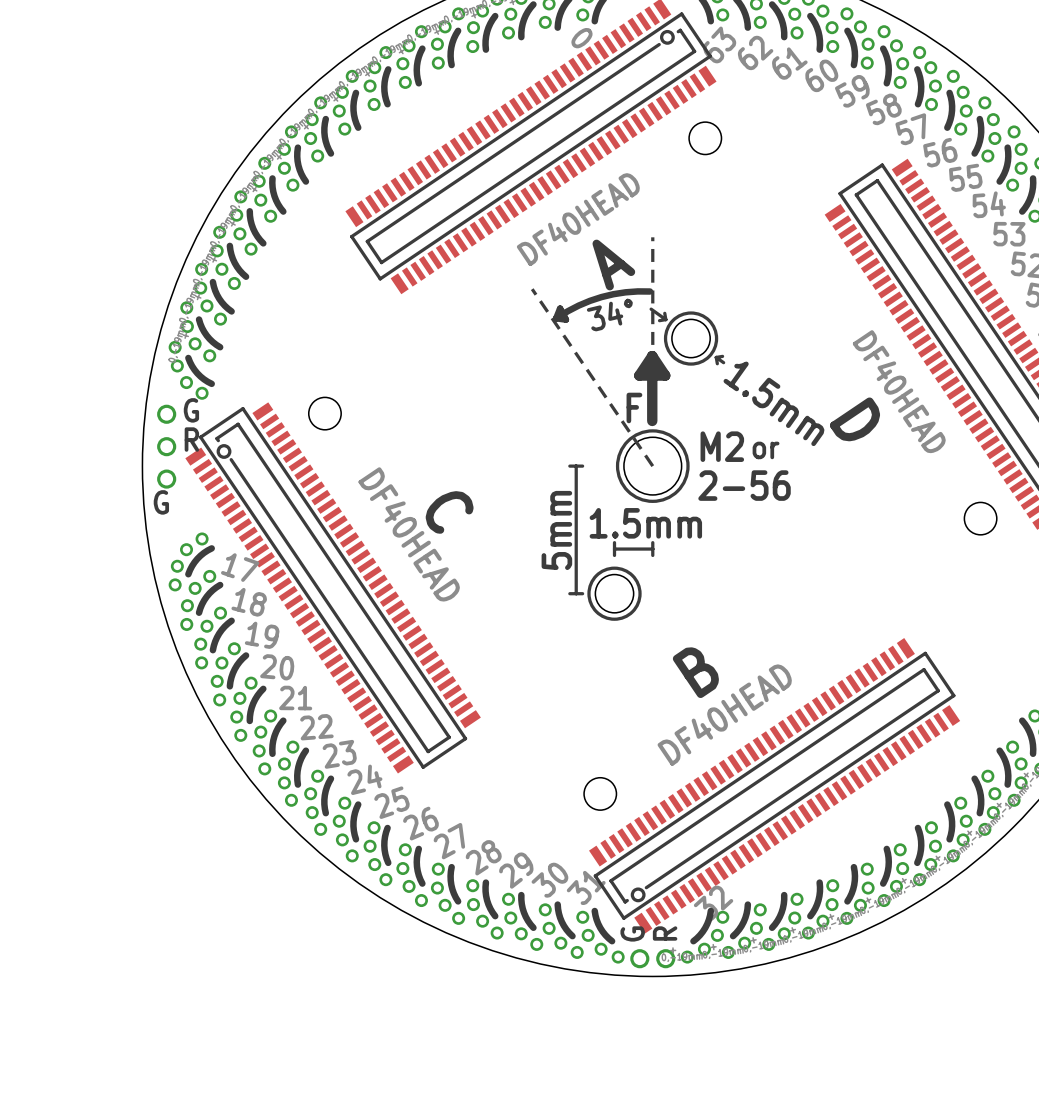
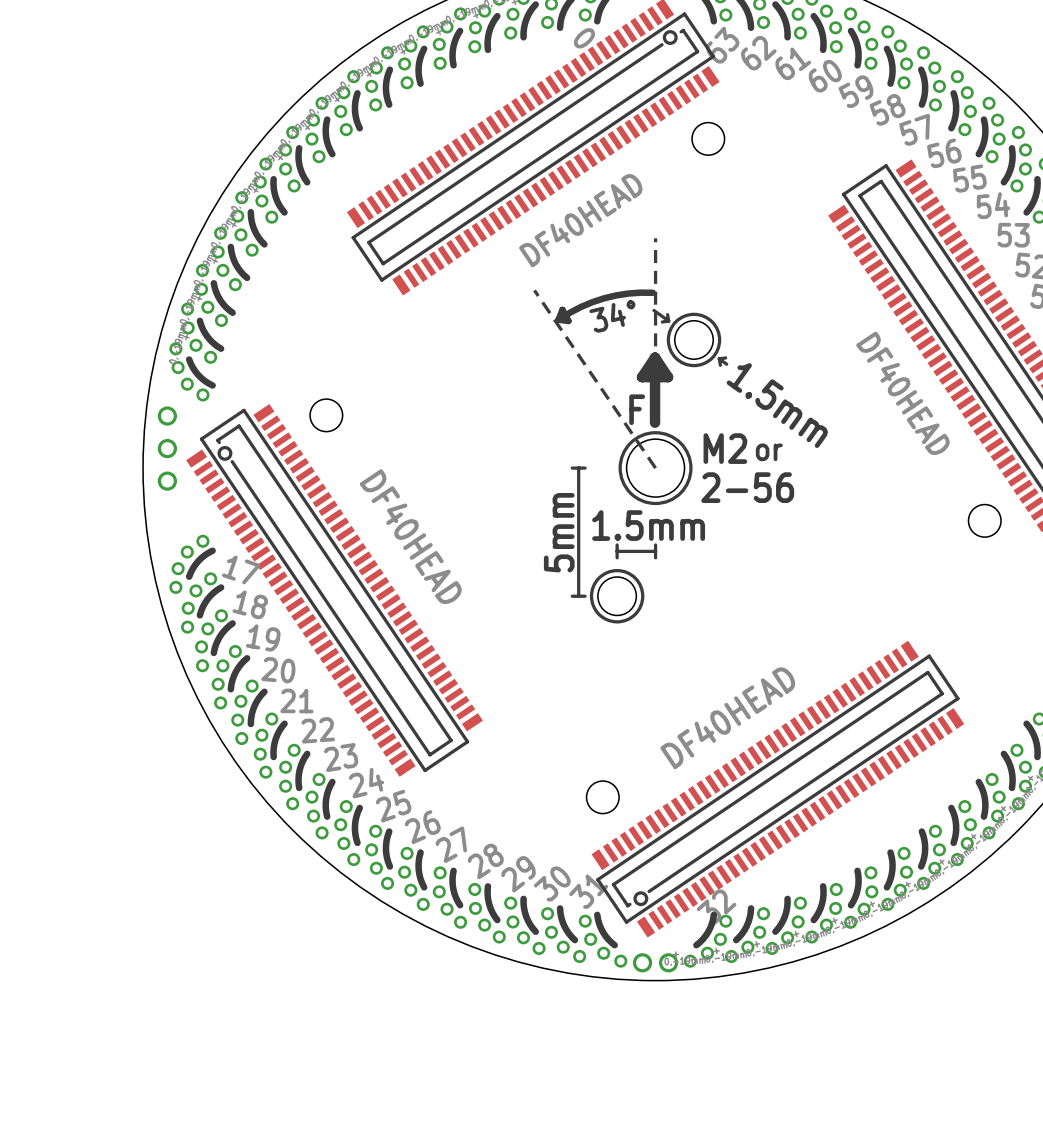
A name: A (613, 265) -> none
text: G (191, 410) -> none
D name: D (855, 419) -> none
text: R (191, 439) -> none
text: G (161, 502) -> none
C name: C (449, 512) -> none
B name: B (695, 672) -> none
text: G (632, 933) -> none
text: R (665, 933) -> none

